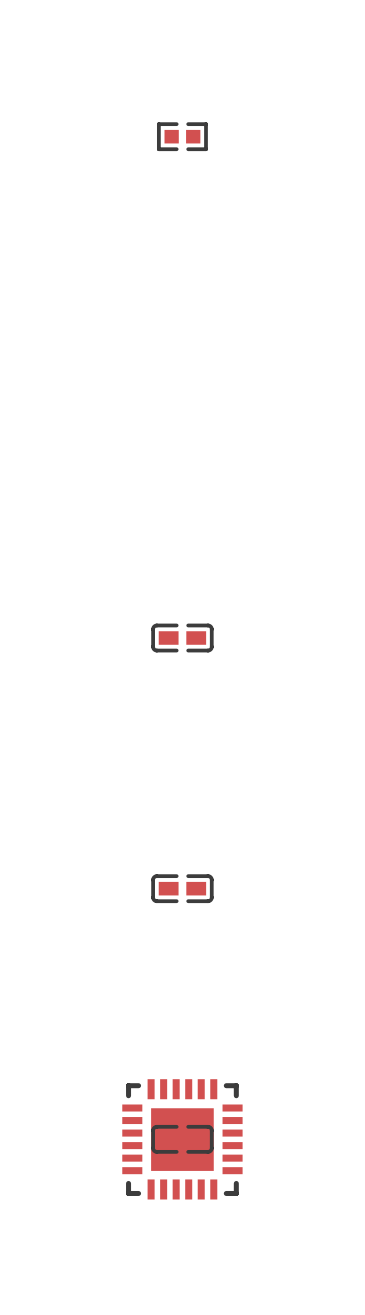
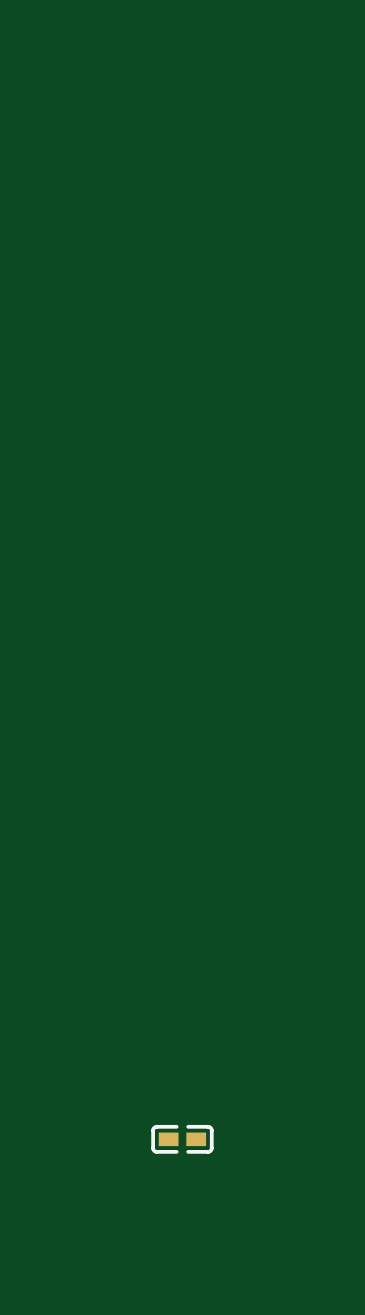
part: (182, 136) -> none
part: (182, 638) -> none
part: (182, 888) -> none
part: (182, 1139) -> none

